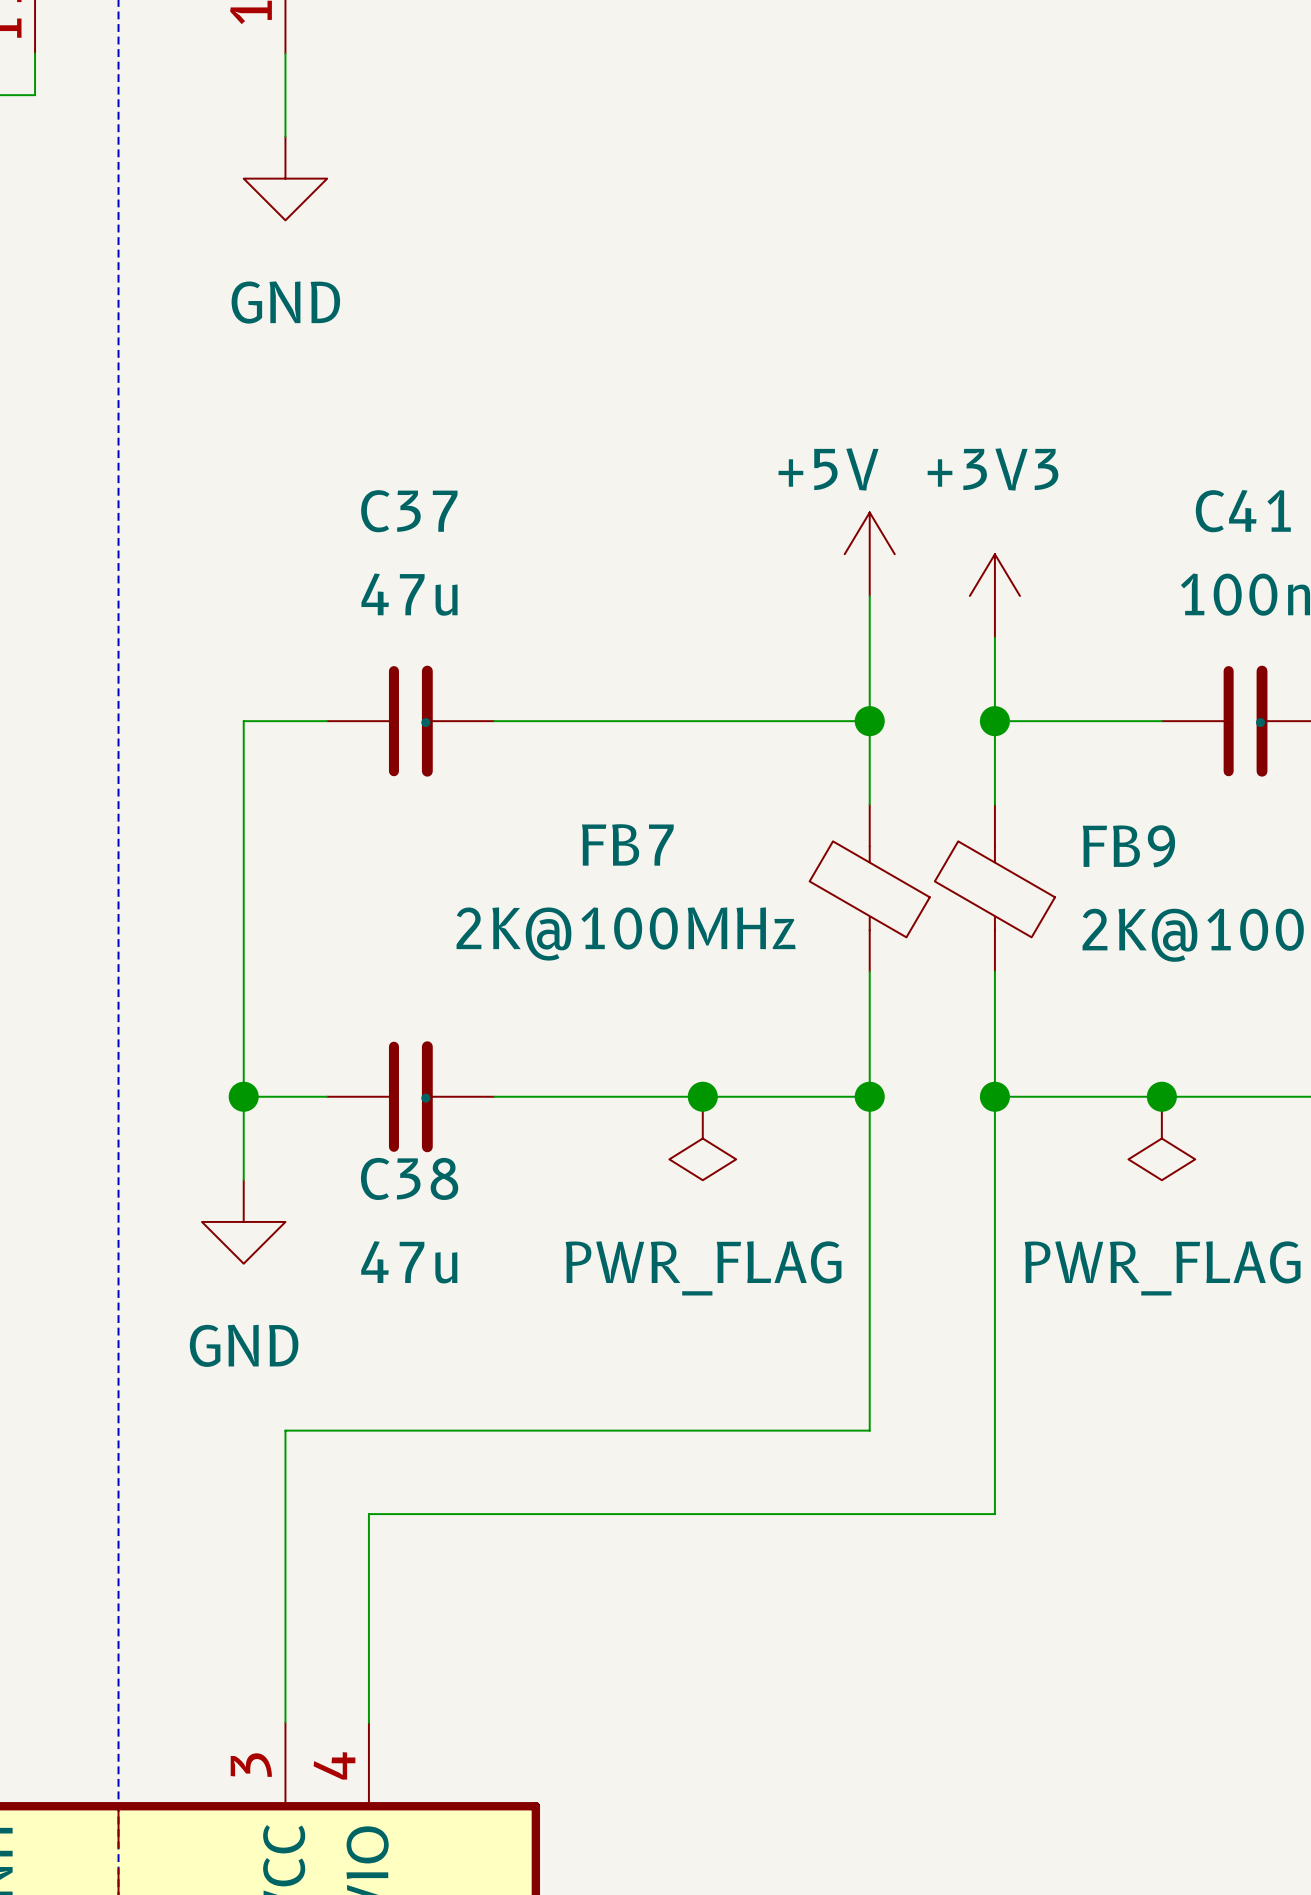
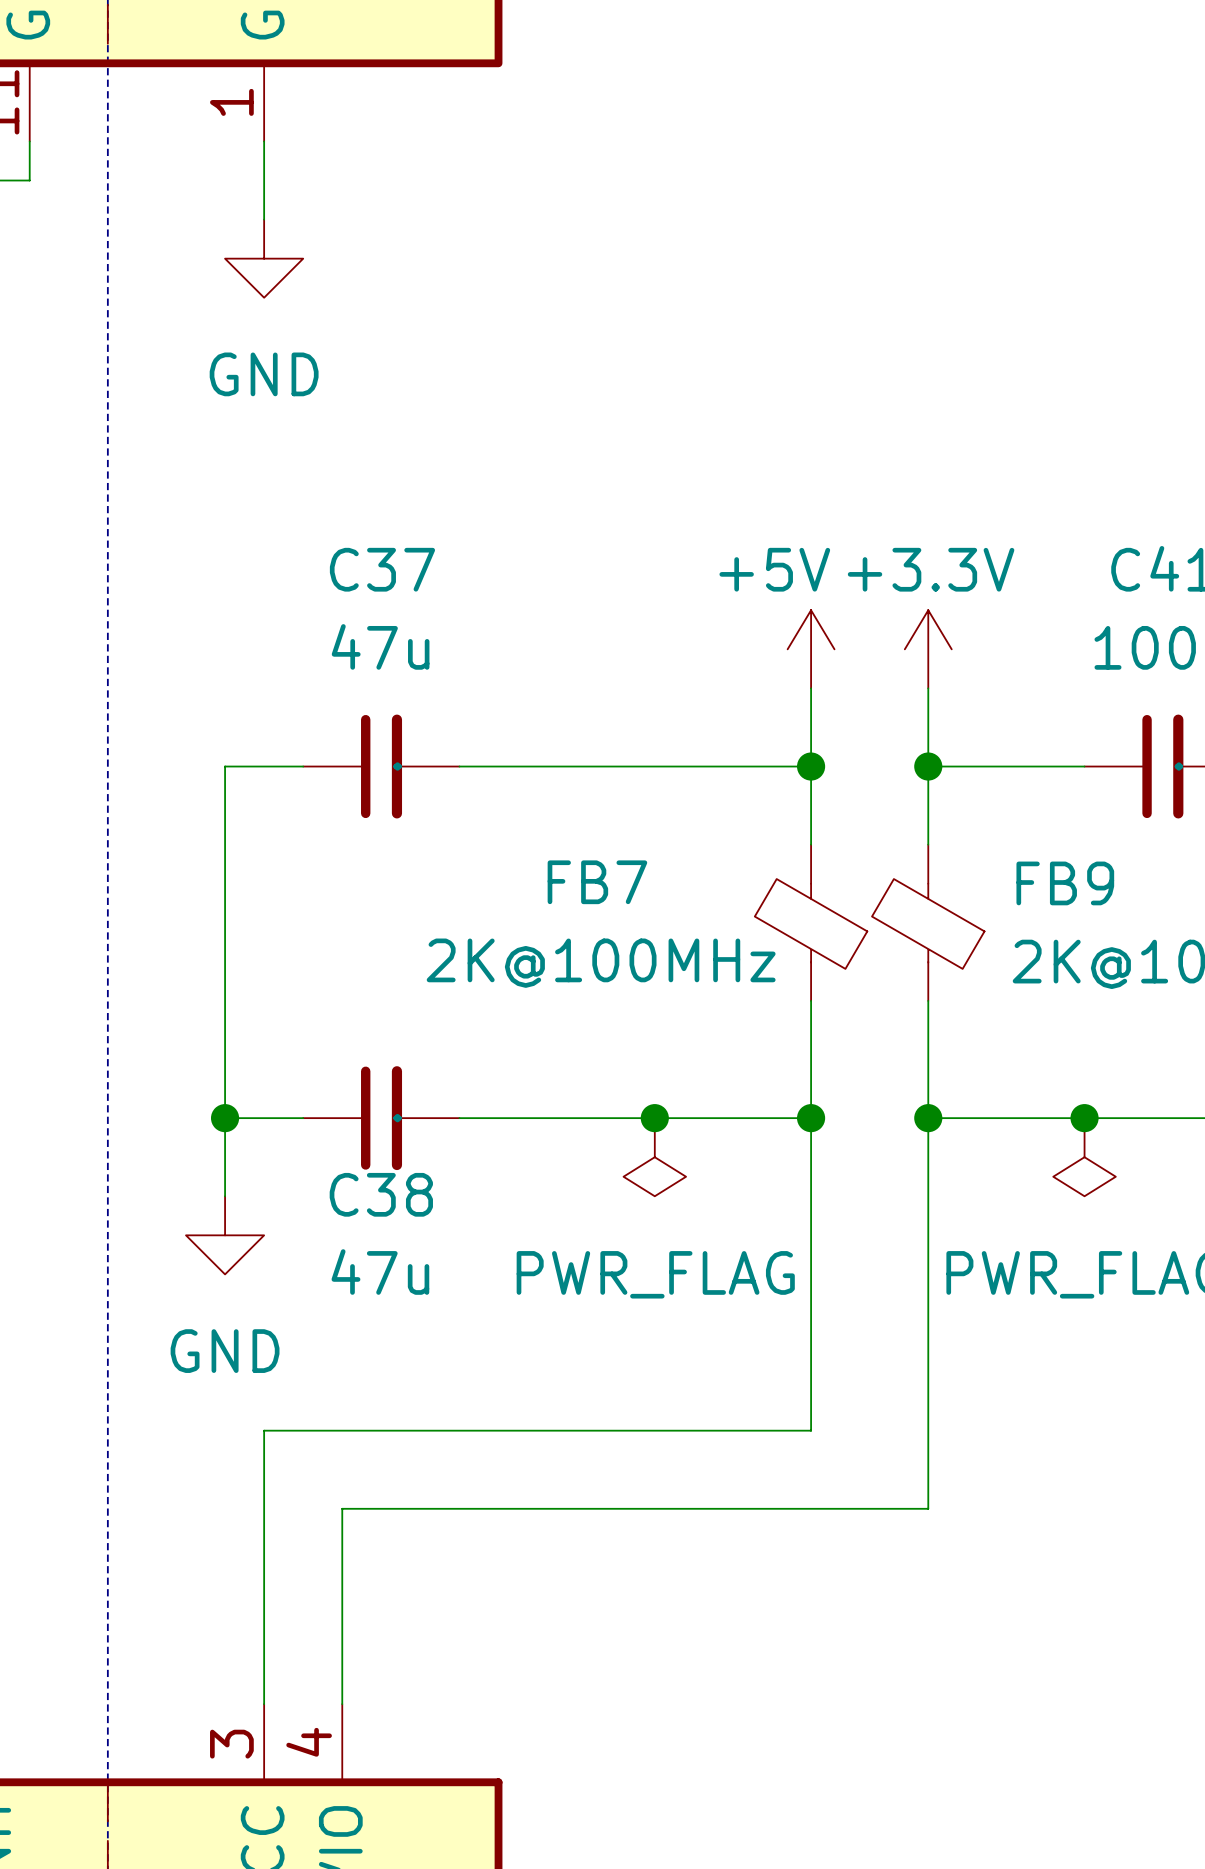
power symbol position: +5V (869, 554) -> +5V (811, 649)
power symbol: +3V3 (994, 595) -> +3.3V (928, 649)

